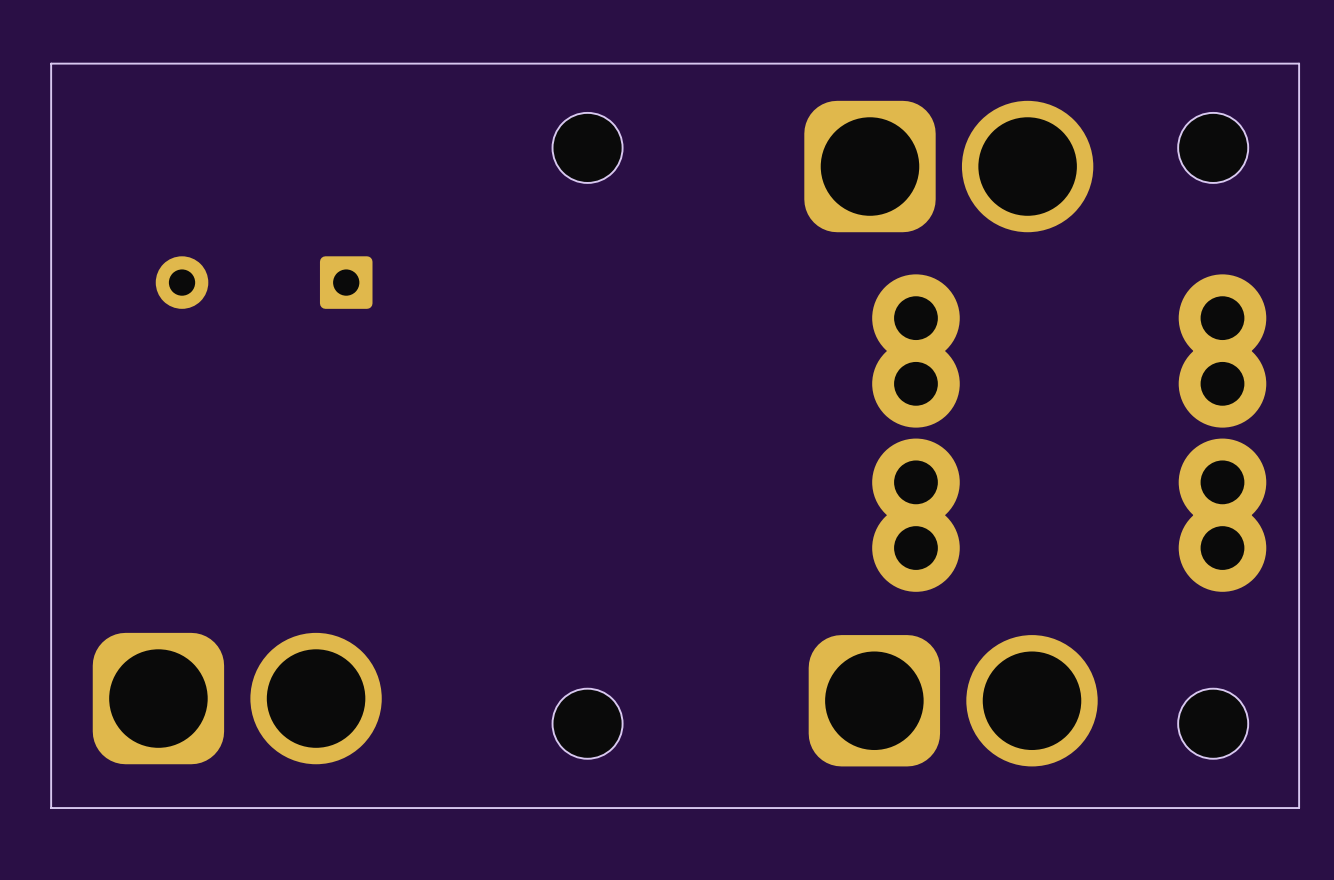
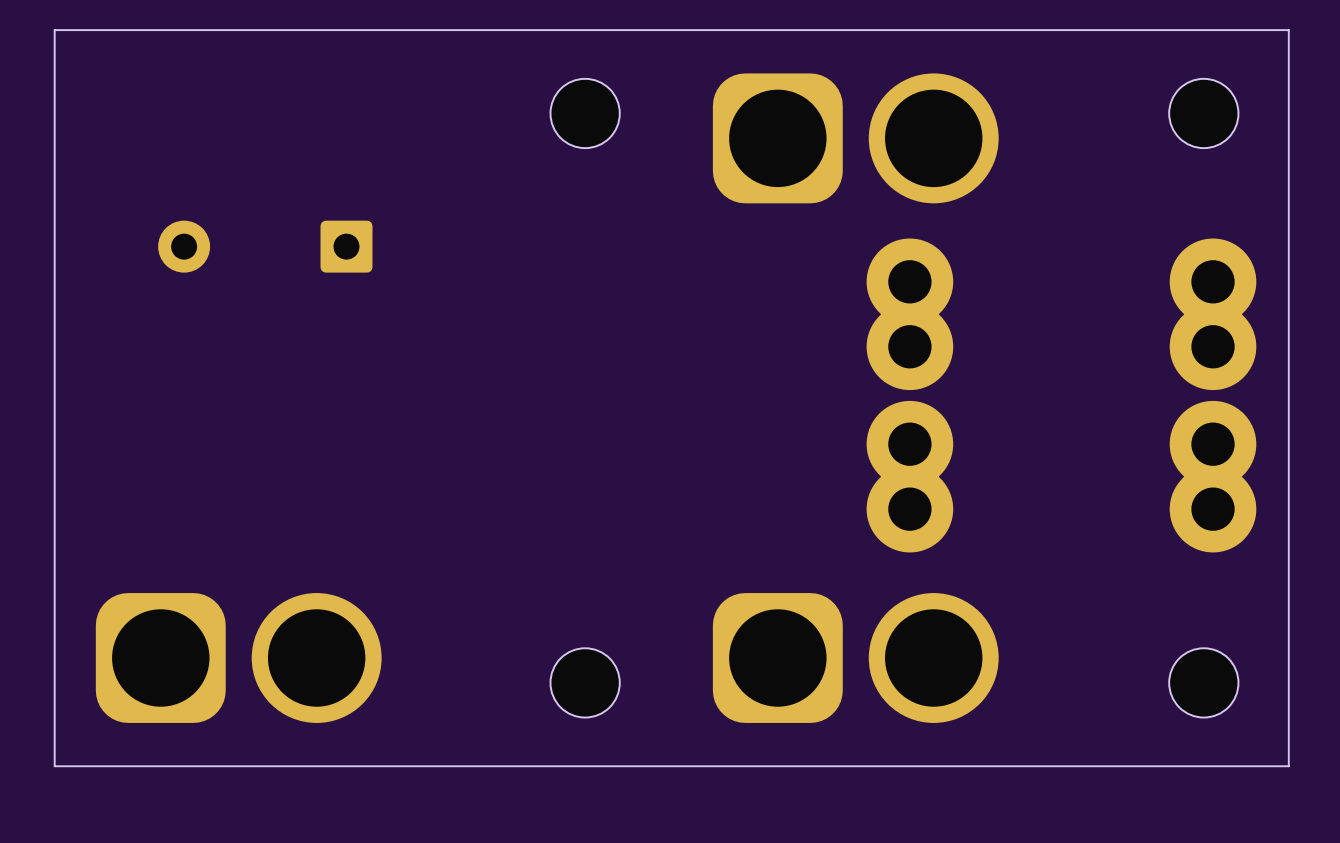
part position: (948, 166) -> (855, 138)
part position: (953, 700) -> (855, 658)

